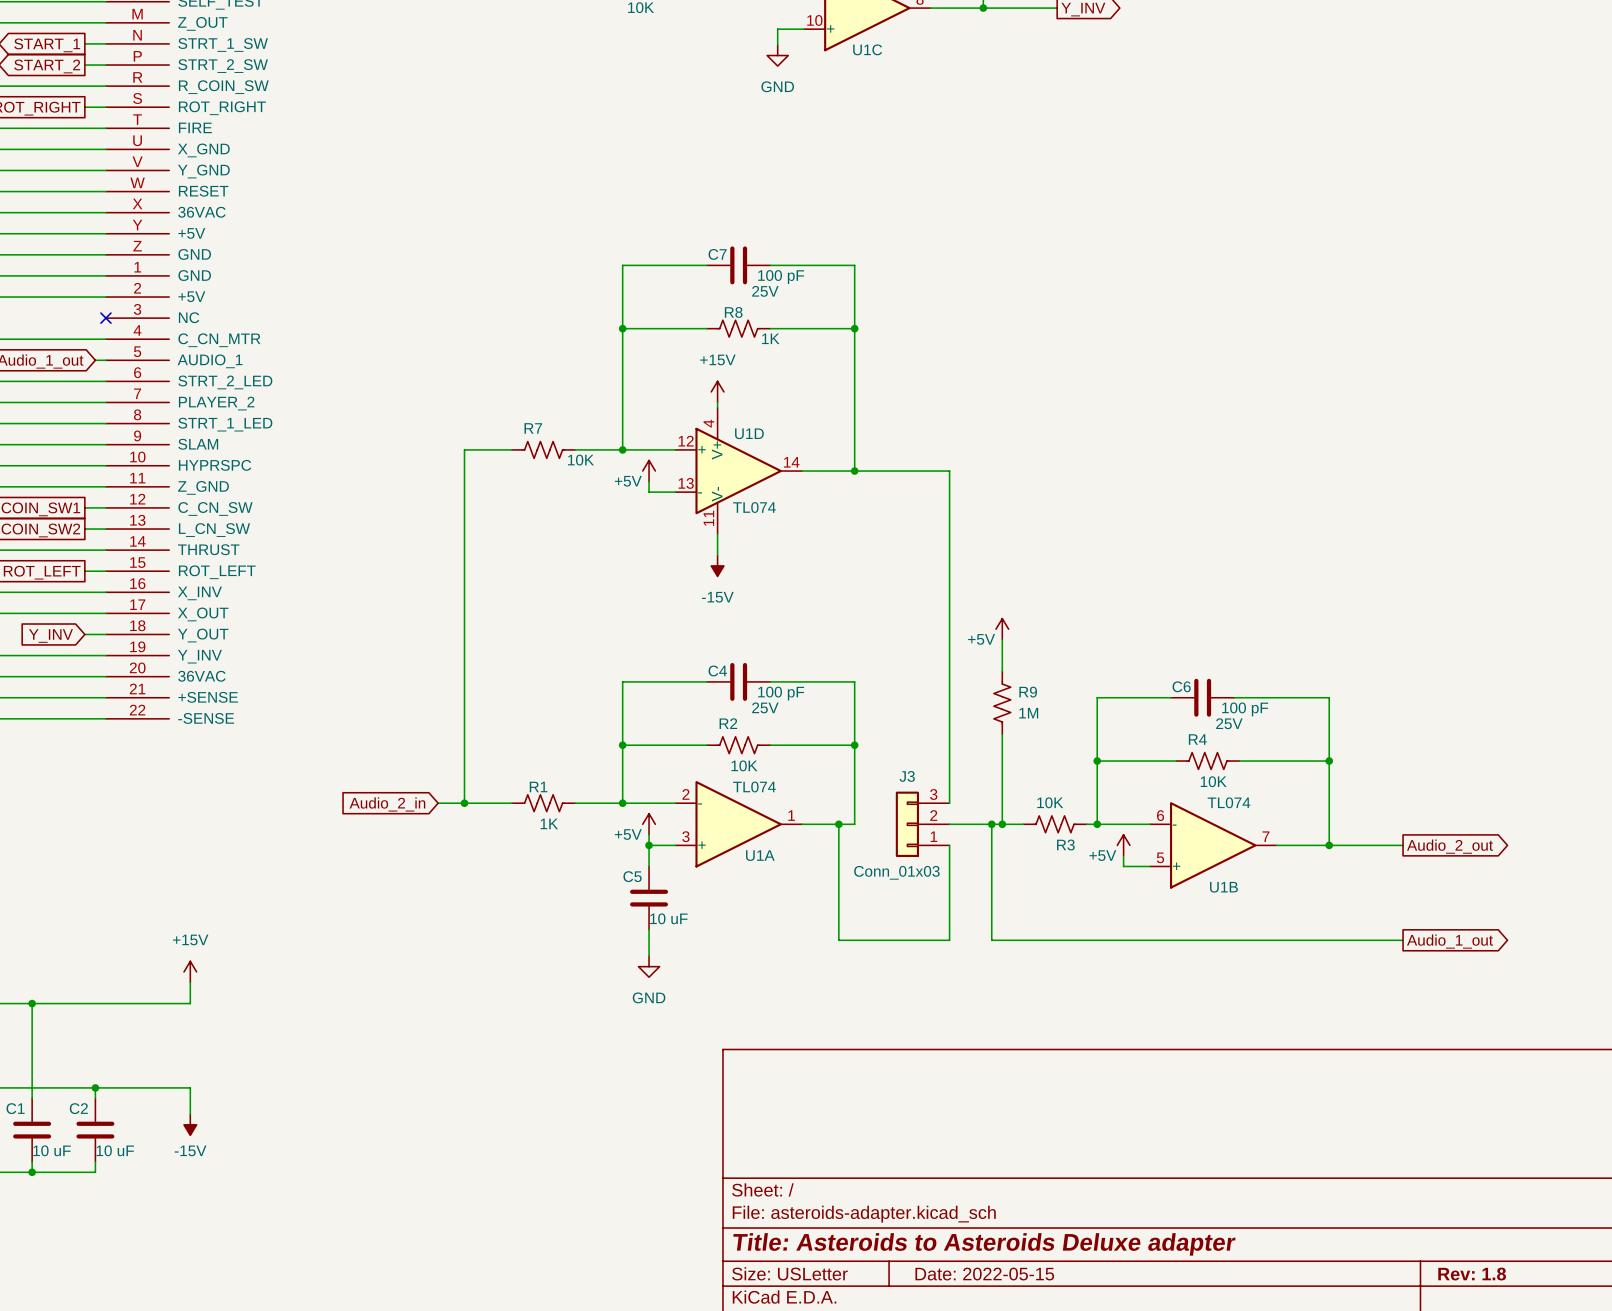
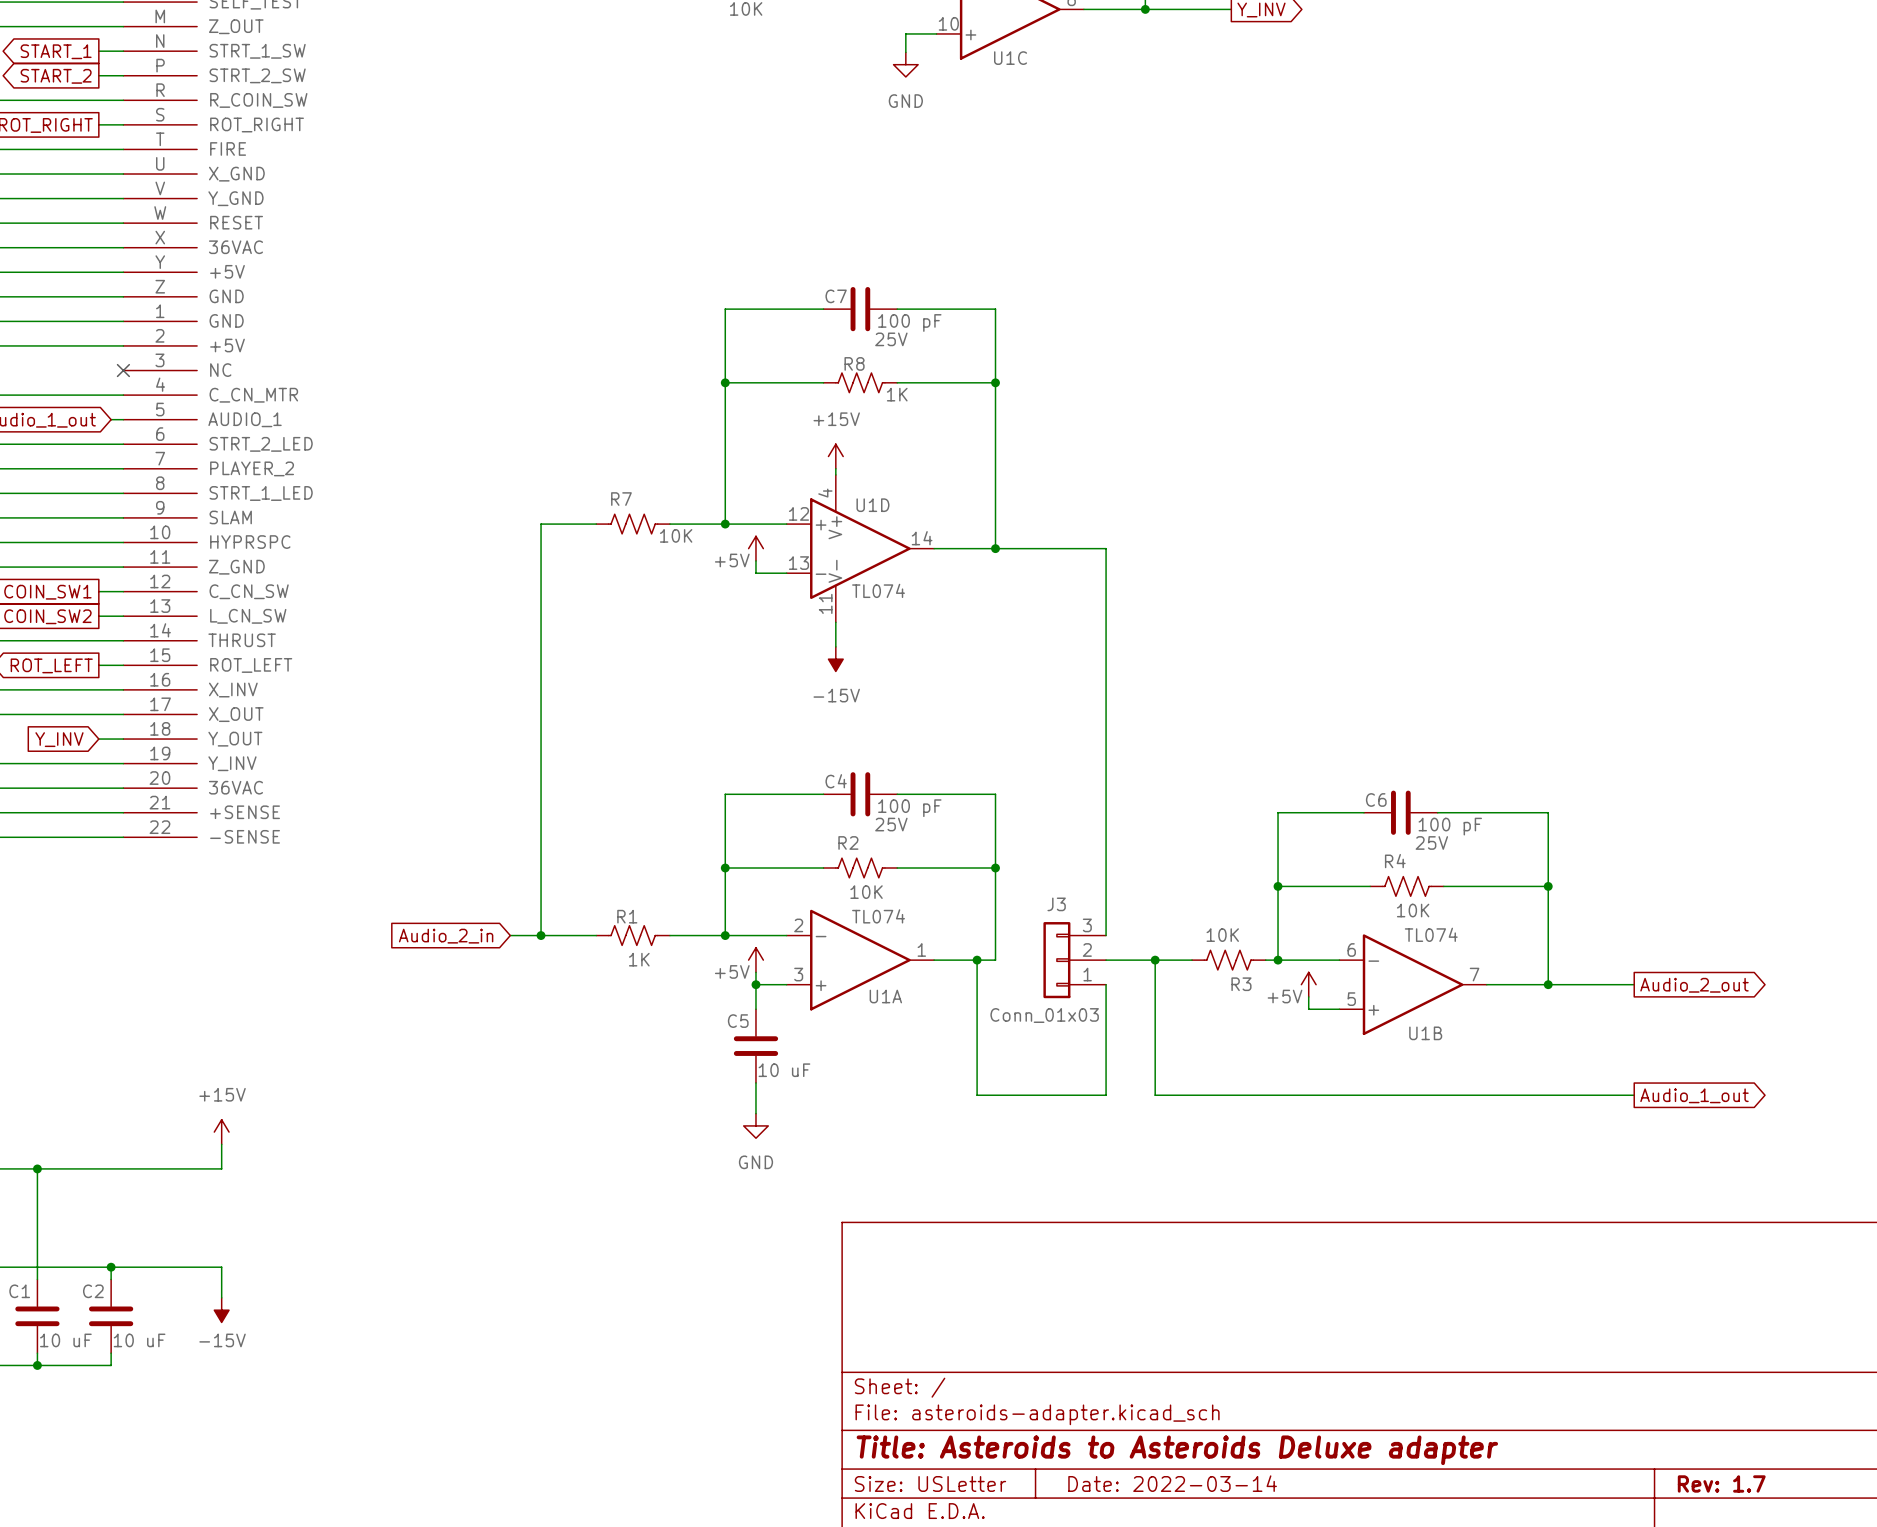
power symbol: +5V (1002, 629) -> none
wire: (1002, 639) (1002, 671) -> none
R9: (1002, 703) -> none
wire: (1002, 734) (1002, 824) -> none
junction: (1002, 824) -> none
title block: Date: 2022-05-15 (984, 1274) -> Date: 2022-03-14 (1172, 1483)
title block: Rev: 1.8 (1472, 1274) -> Rev: 1.7 (1721, 1483)

